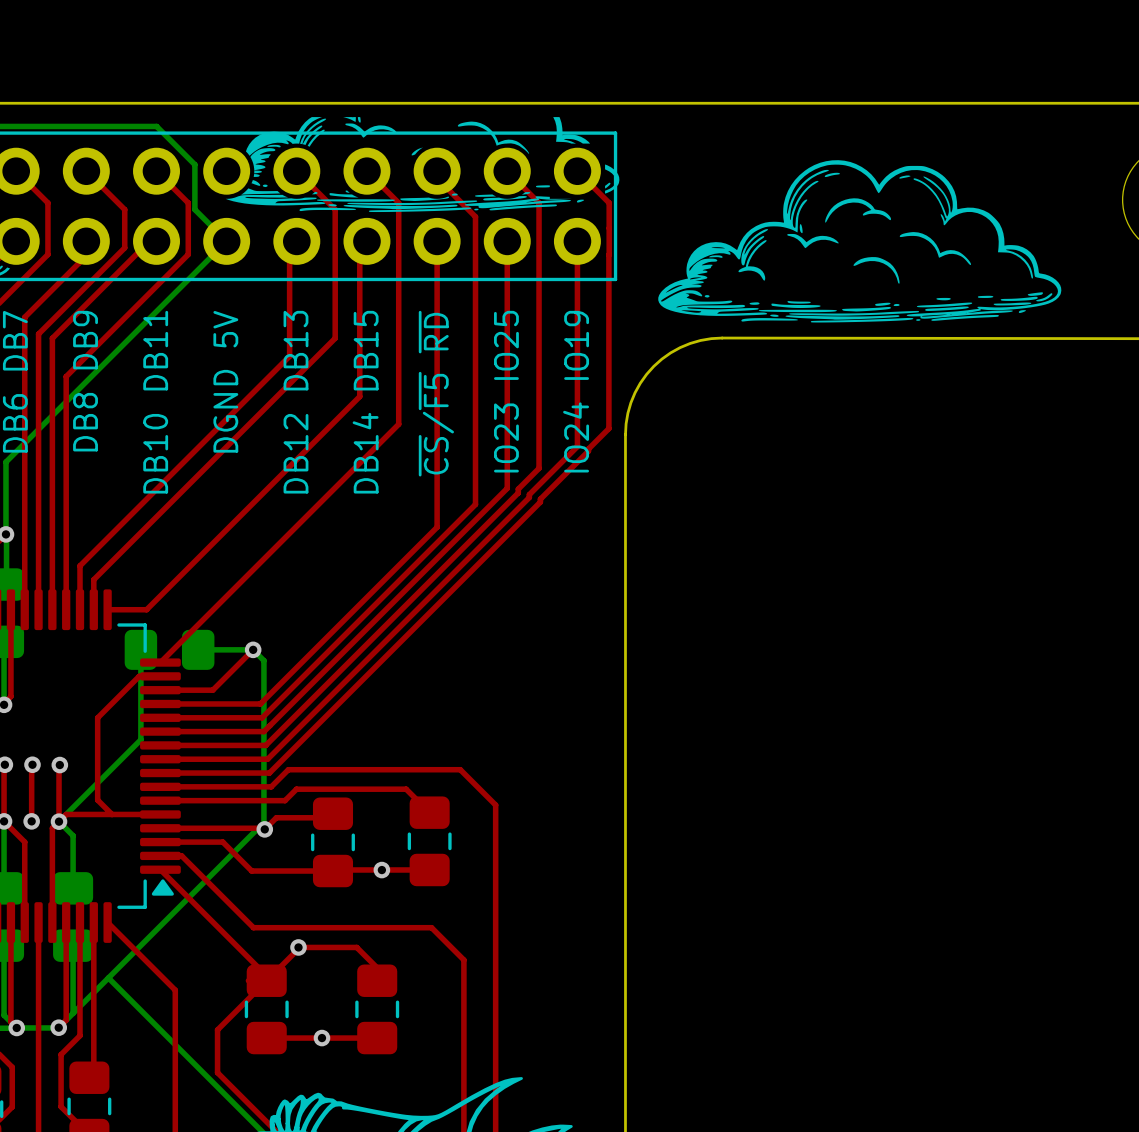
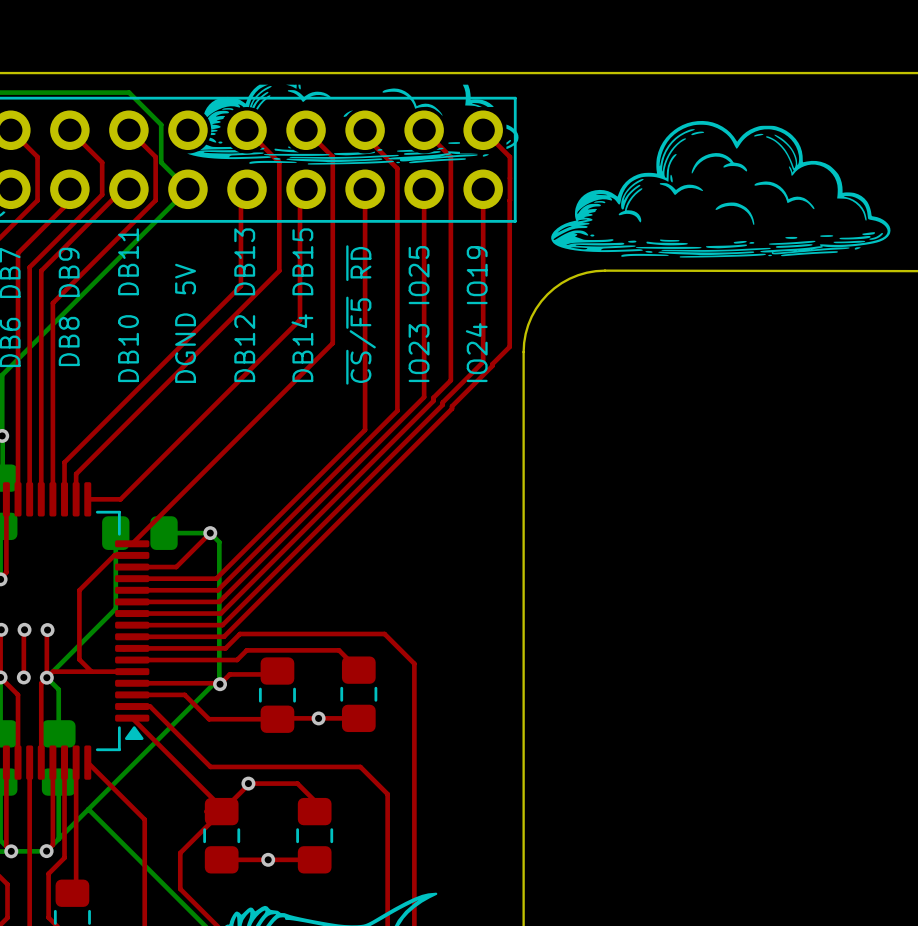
text position: DGND 5V (225, 381) -> DGND 5V (185, 323)
text position: IO23 IO25 (506, 391) -> IO23 IO25 (419, 314)
text position: IO24 IO19 (576, 391) -> IO24 IO19 (476, 314)
text position: ~{CS}/~{F5} ~{RD} (436, 393) -> ~{CS}/~{F5} ~{RD} (361, 314)
text position: DB10 DB11 (155, 402) -> DB10 DB11 (128, 305)
text position: DB12 DB13 (295, 402) -> DB12 DB13 (244, 305)
text position: DB14 DB15 (365, 402) -> DB14 DB15 (302, 305)

